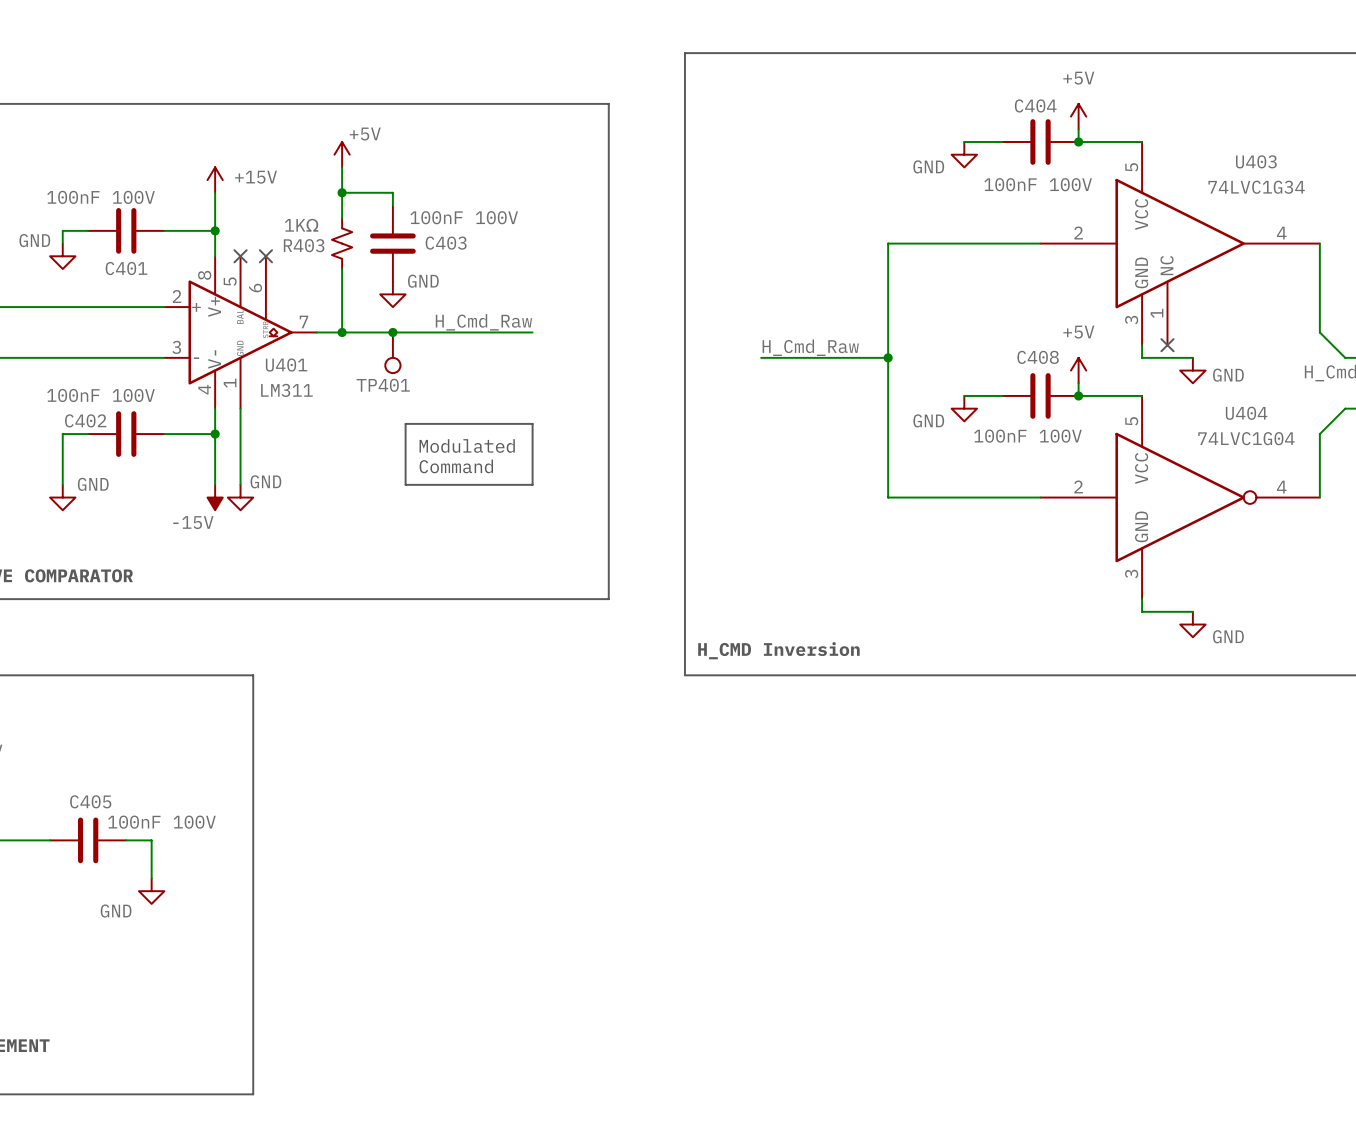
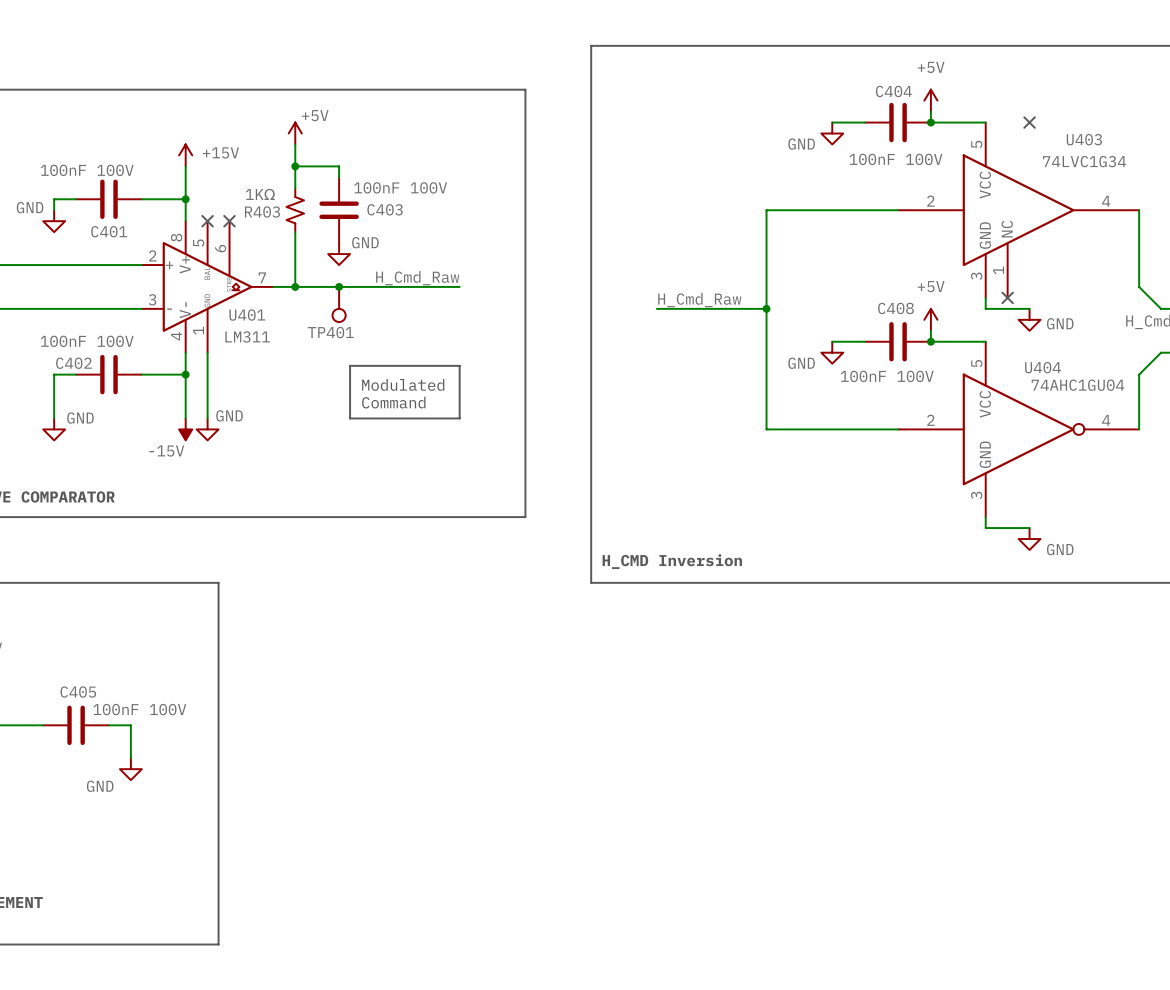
no-connect mark: none -> (1029, 122)
U404 name position: U404 (1246, 413) -> U404 (1043, 367)
U404 value: 74LVC1G04 (1246, 438) -> 74AHC1GU04 (1077, 385)

